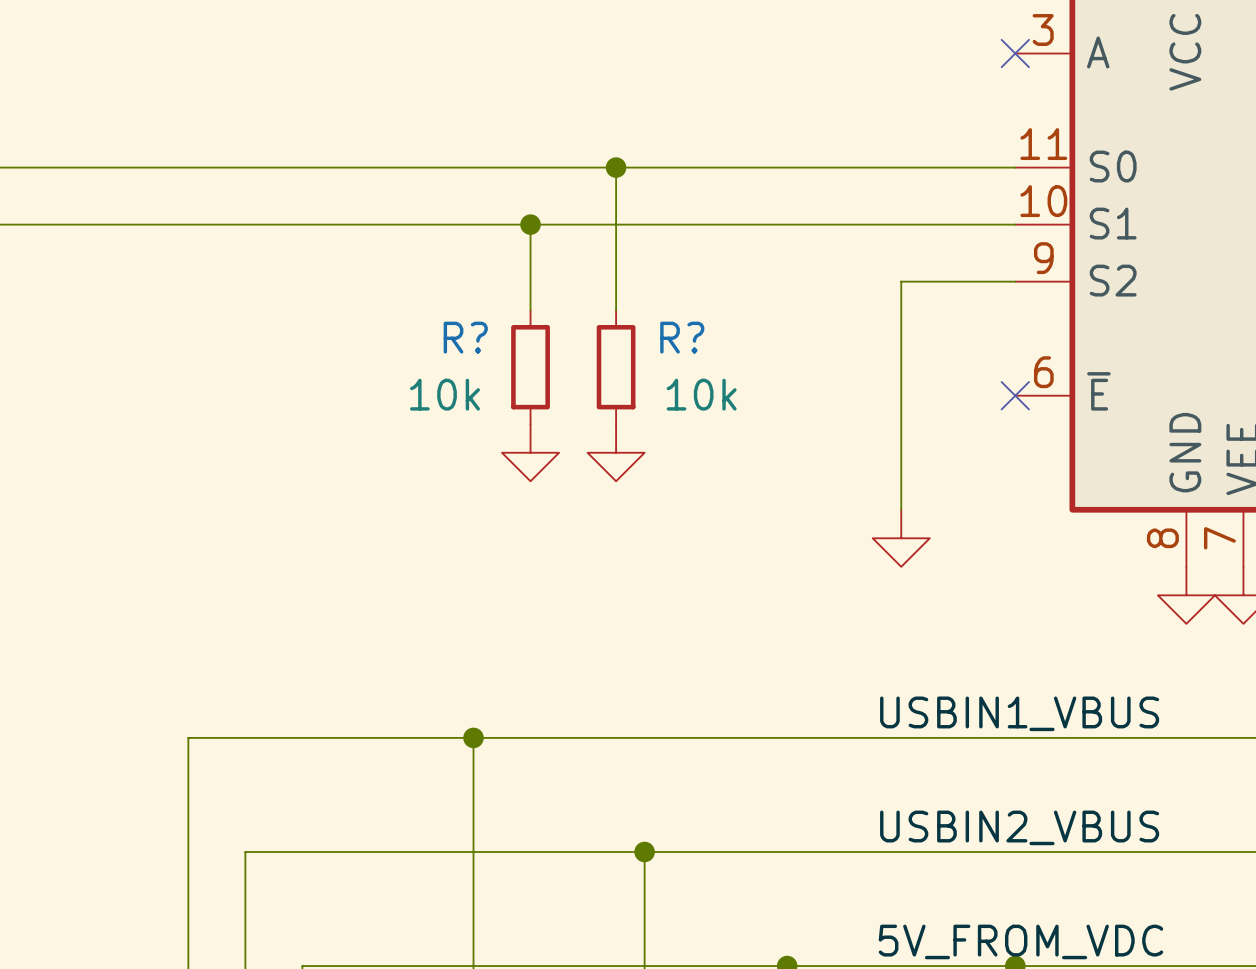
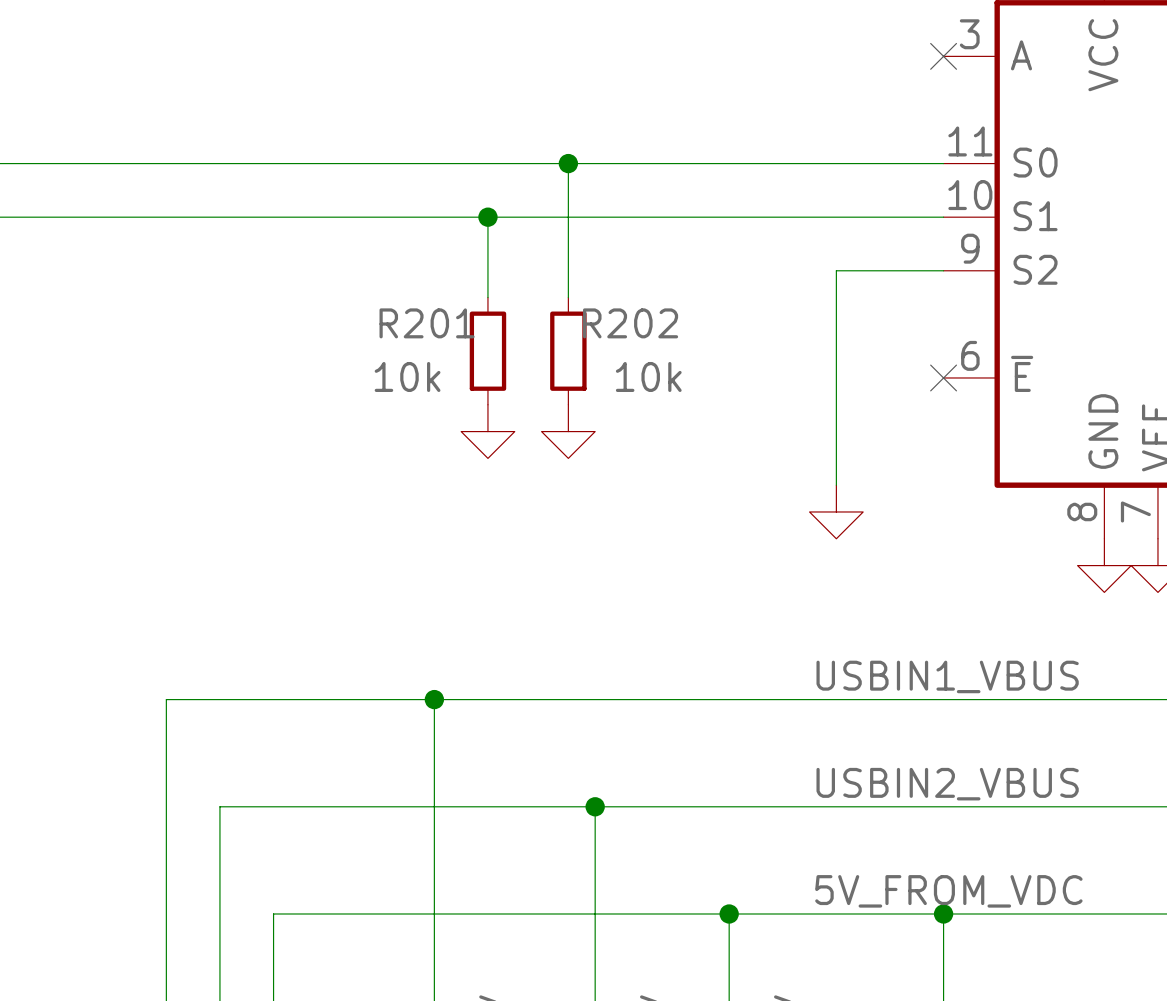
R? name: R? (465, 337) -> R201 (427, 323)
R? name: R? (682, 337) -> R202 (630, 323)

